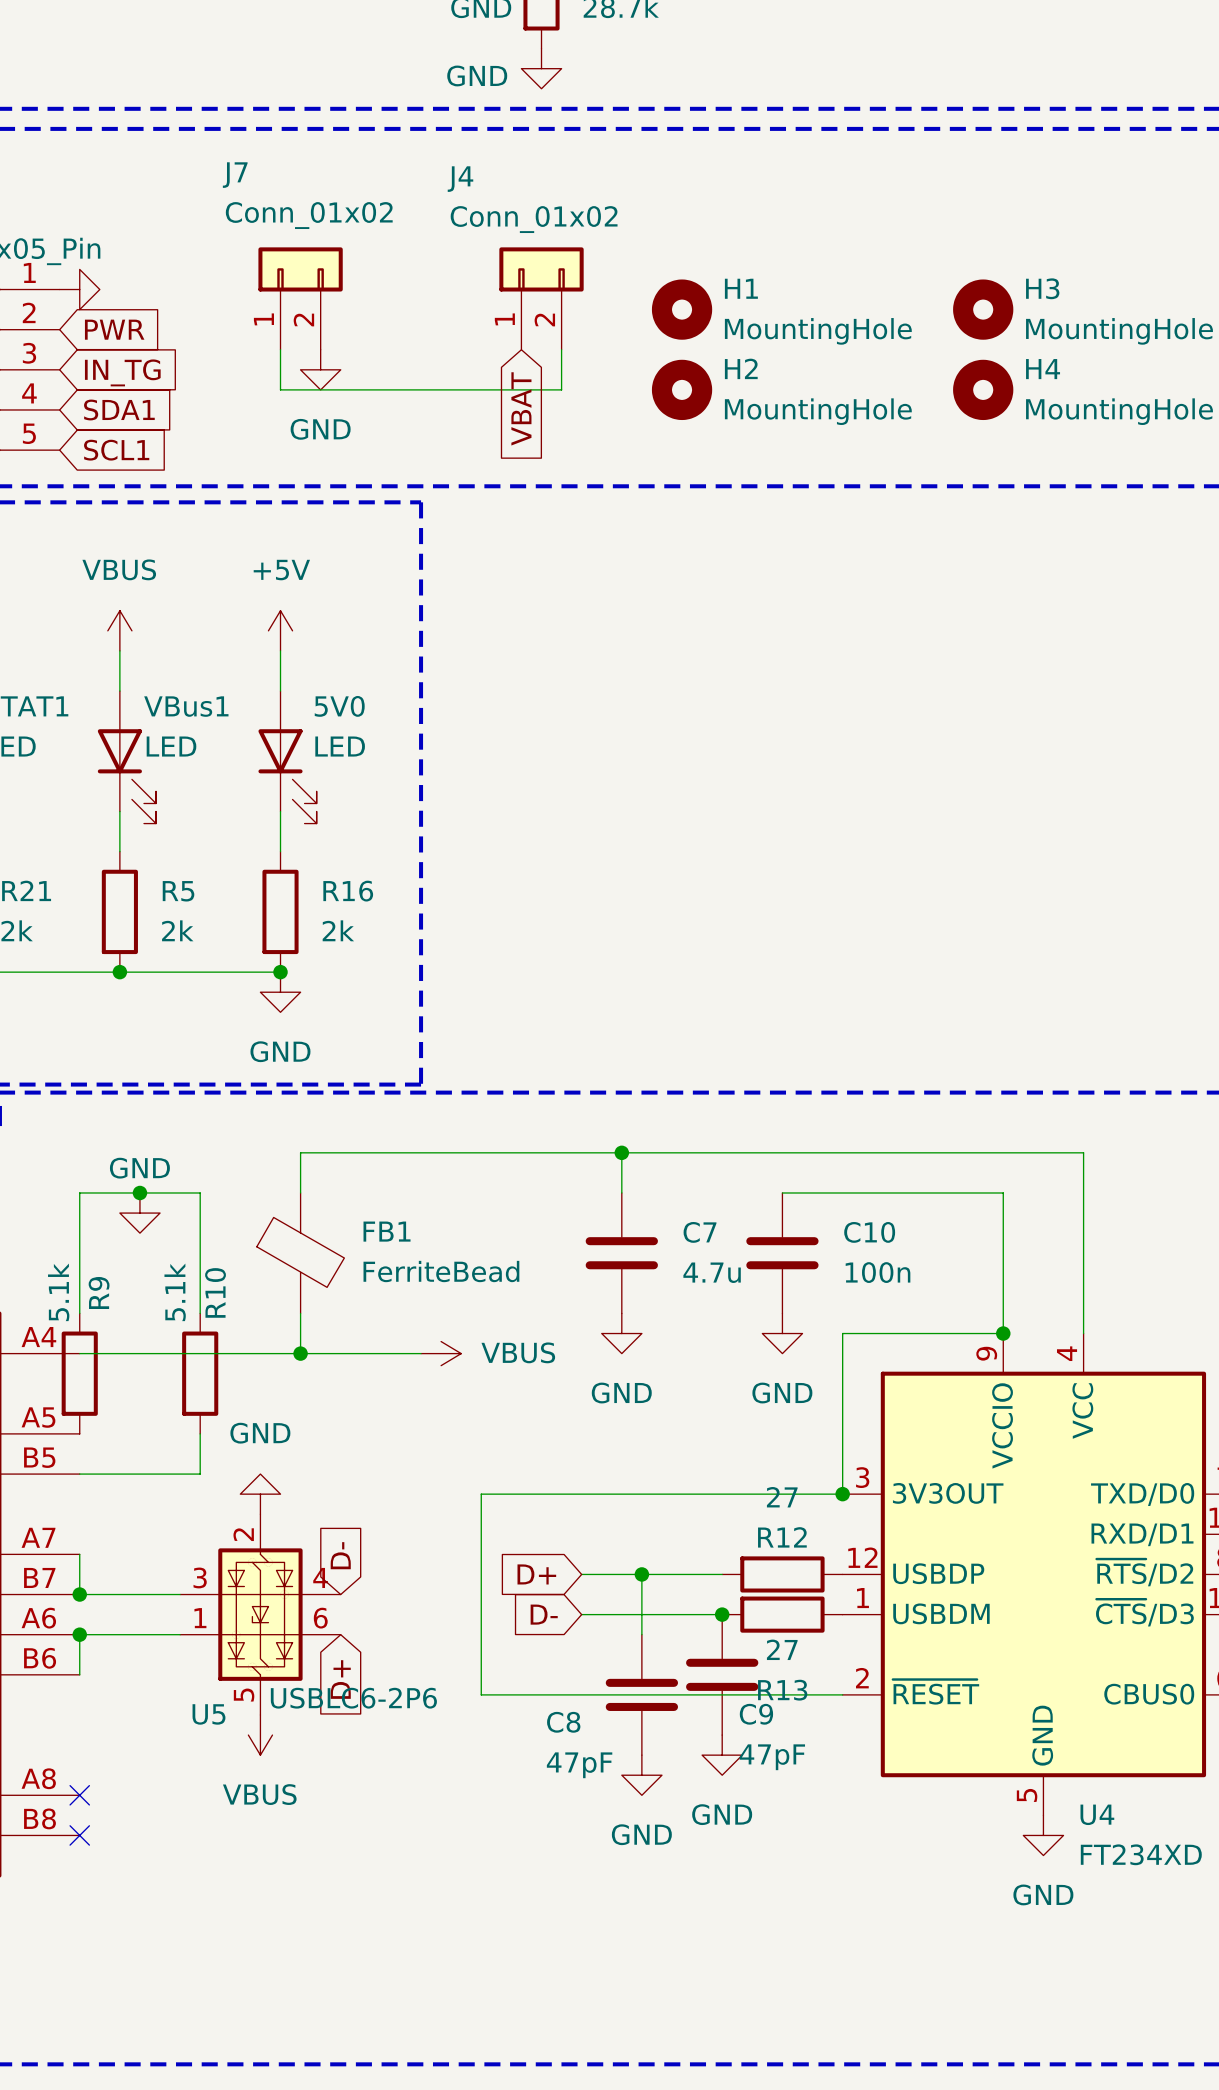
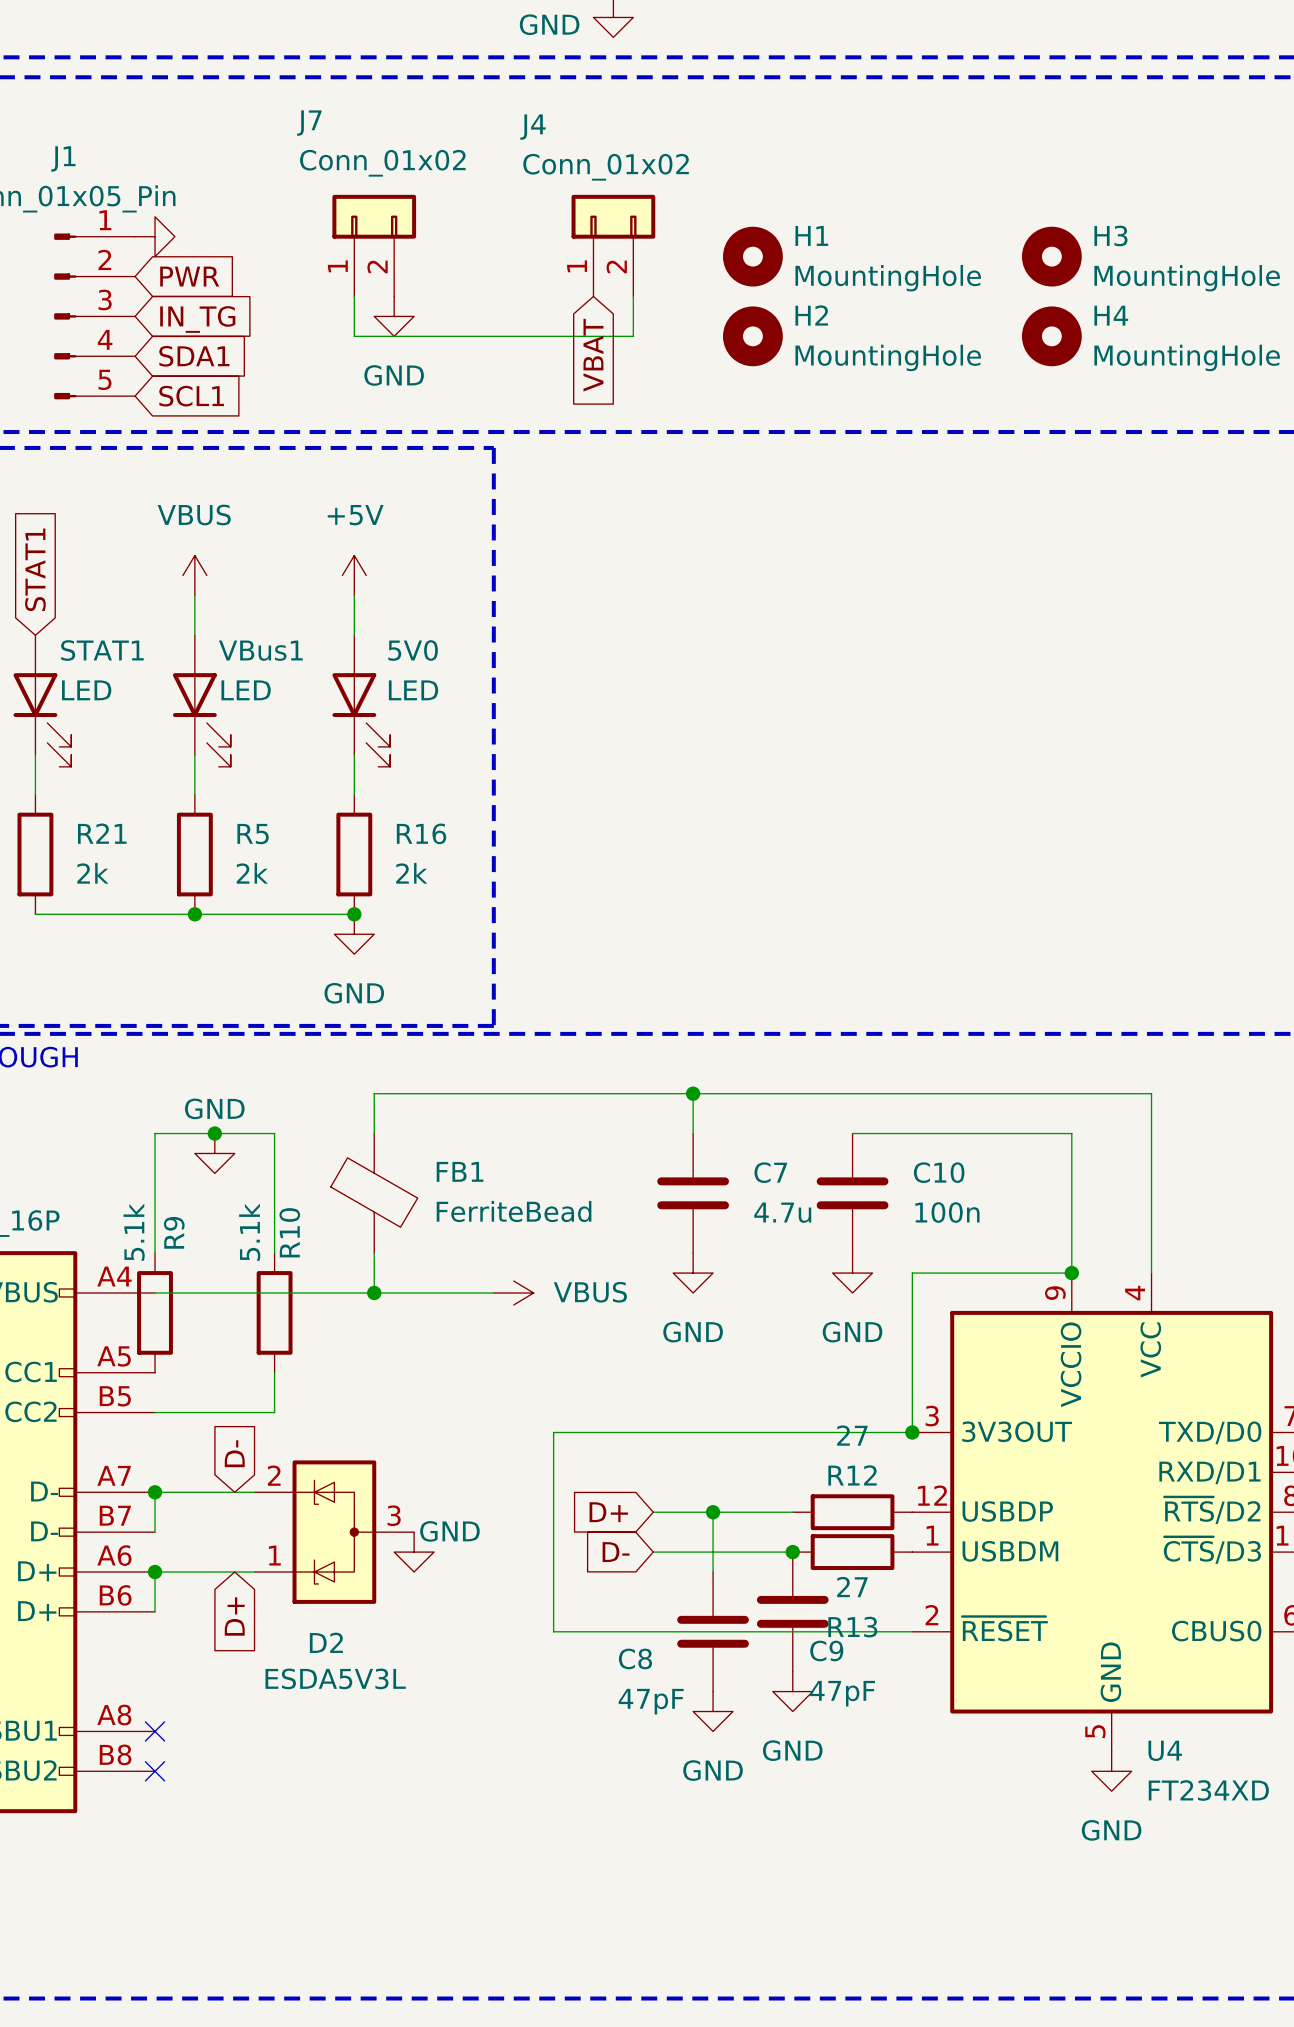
power symbol text position: GND (260, 1433) -> GND (449, 1531)
power symbol rotation: 0° (260, 1494) -> 180° (414, 1552)
power symbol position: GND (260, 1494) -> GND (414, 1552)
global label position: D- (340, 1555) -> D- (234, 1453)
wire: (79, 1594) (180, 1594) -> (155, 1492) (254, 1492)
junction position: (79, 1594) -> (155, 1492)
D2: none -> ESDA5V3L (334, 1532)
U5: USBLC6-2P6 (260, 1614) -> none
global label position: D+ (340, 1679) -> D+ (234, 1616)
power symbol: VBUS (260, 1735) -> none

